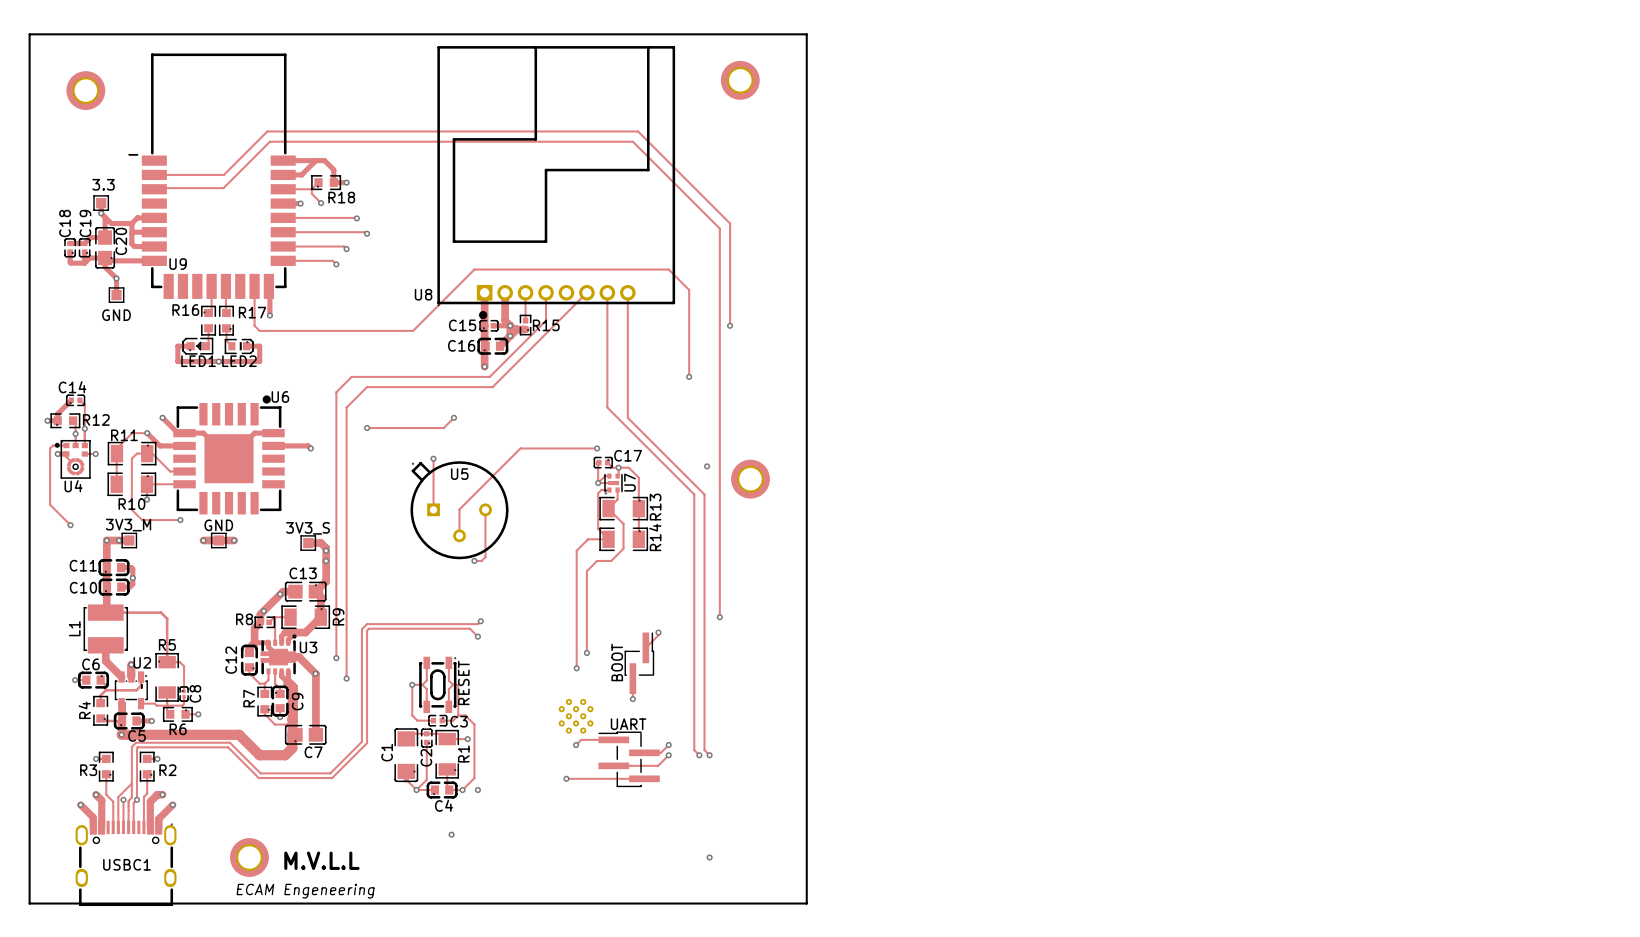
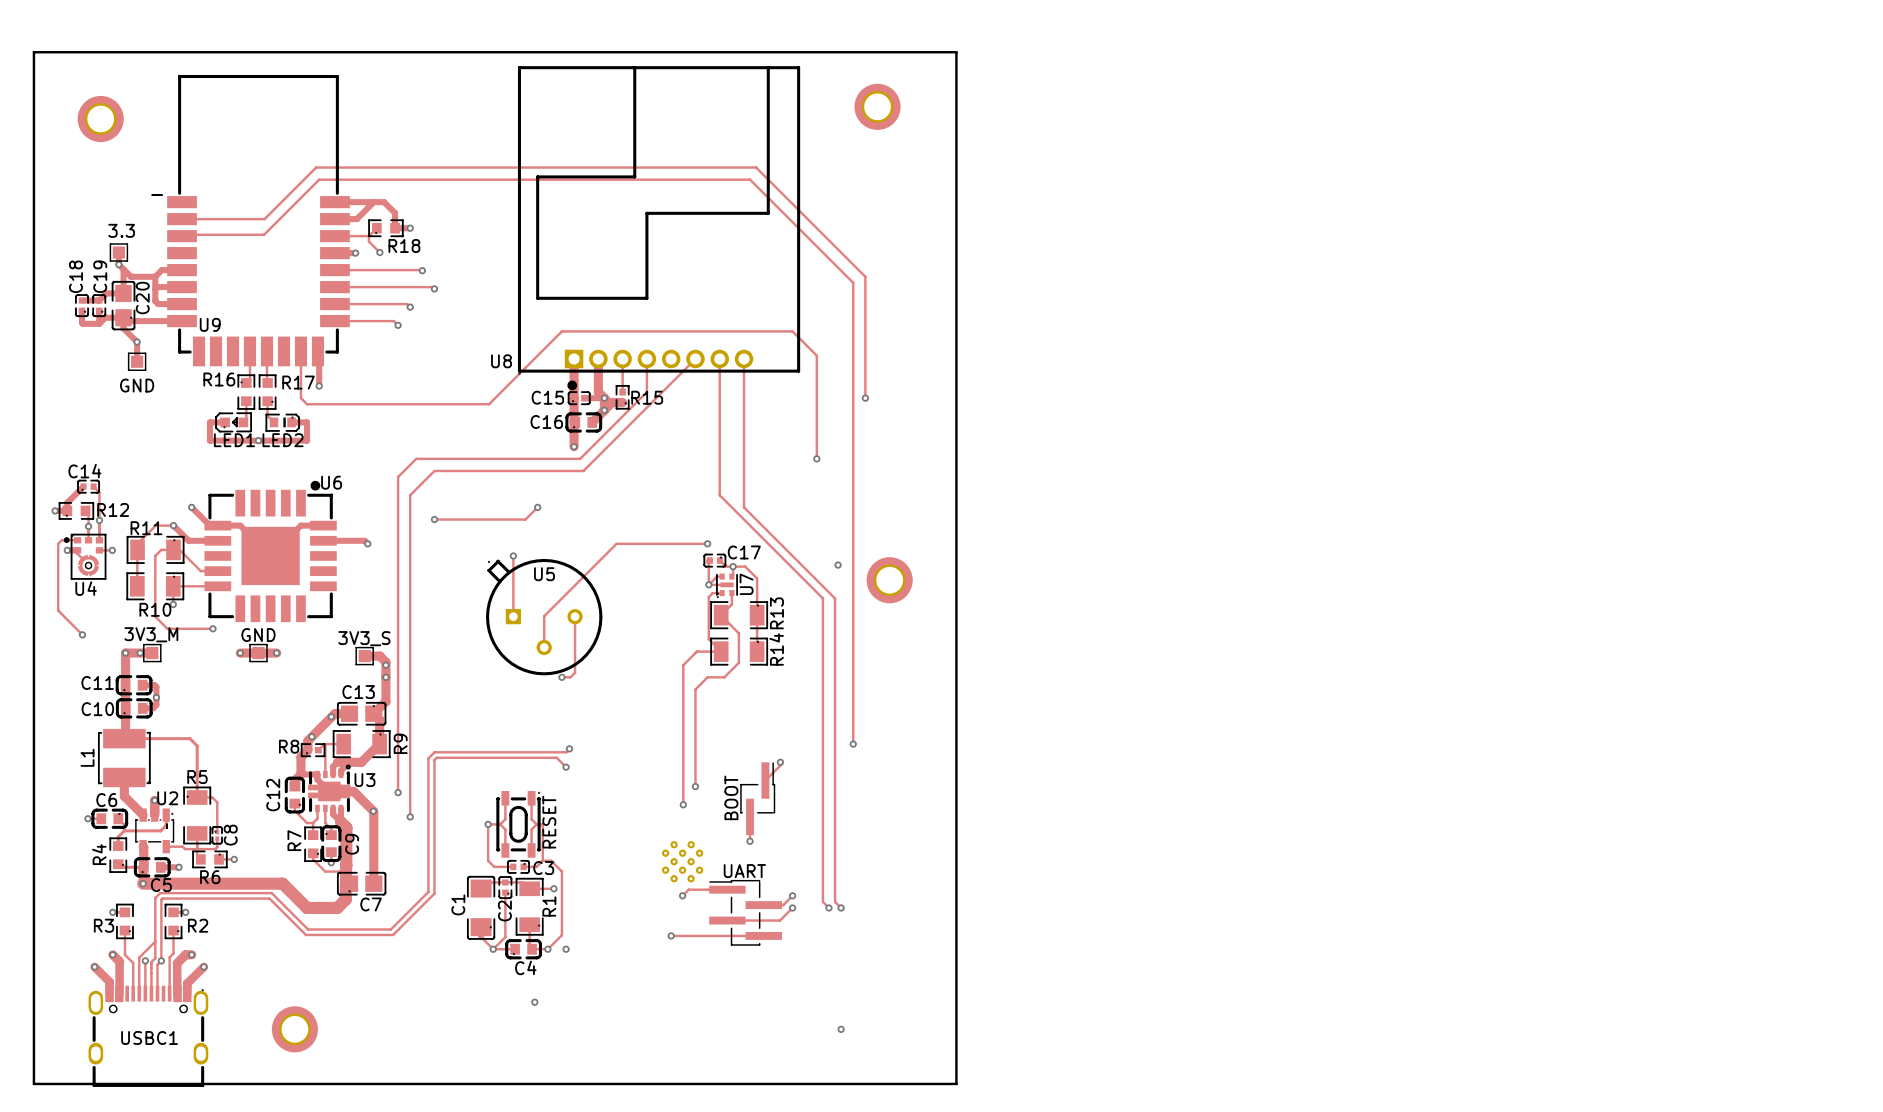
text: M.V.L.L (321, 860) -> none
text: ECAM Engeneering (305, 891) -> none

